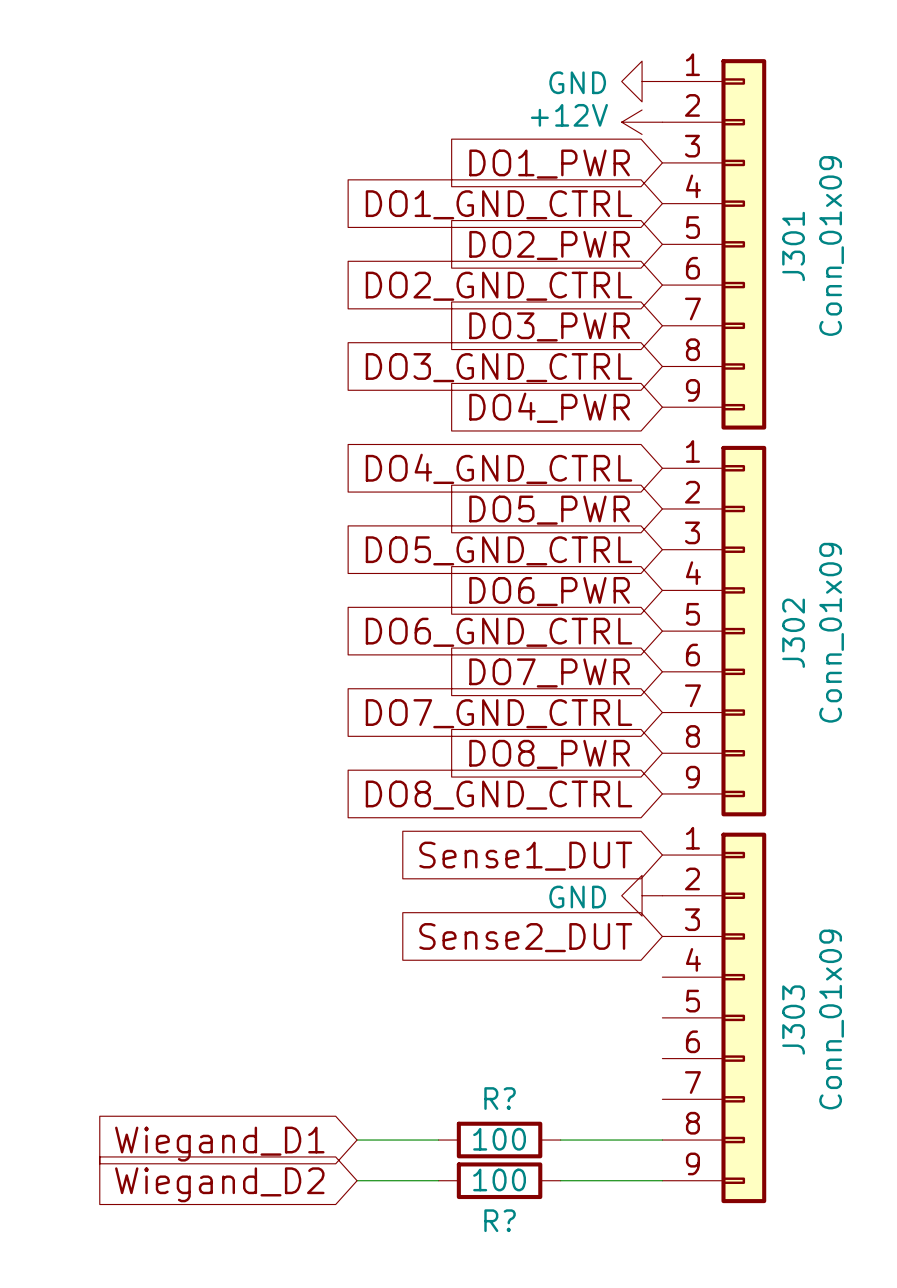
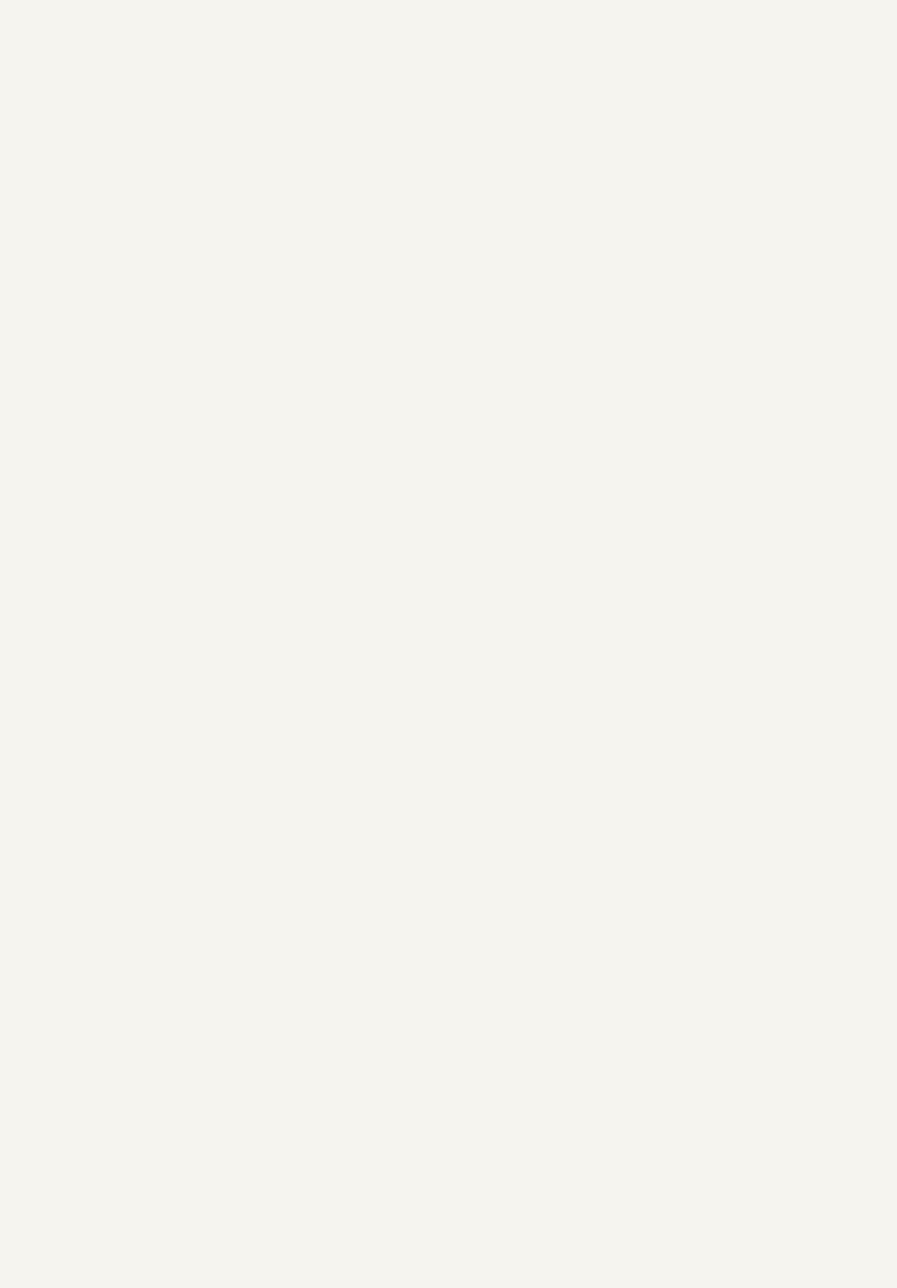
power symbol: GND (642, 81) -> none
power symbol: +12V (642, 122) -> none
global label: DO1_PWR (549, 164) -> none
global label: DO1_GND_CTRL (498, 204) -> none
J301: Conn_01x09 (714, 244) -> none
global label: DO2_PWR (549, 245) -> none
global label: DO2_GND_CTRL (498, 286) -> none
global label: DO3_PWR (549, 326) -> none
global label: DO3_GND_CTRL (498, 367) -> none
global label: DO4_PWR (549, 407) -> none
global label: DO4_GND_CTRL (498, 468) -> none
global label: DO5_PWR (549, 510) -> none
global label: DO5_GND_CTRL (498, 550) -> none
global label: DO6_PWR (549, 591) -> none
J302: Conn_01x09 (714, 631) -> none
global label: DO6_GND_CTRL (498, 632) -> none
global label: DO7_PWR (549, 672) -> none
global label: DO7_GND_CTRL (498, 713) -> none
global label: DO8_PWR (549, 754) -> none
global label: DO8_GND_CTRL (498, 795) -> none
global label: Sense1_DUT (525, 856) -> none
power symbol: GND (642, 895) -> none
global label: Sense2_DUT (525, 937) -> none
J303: Conn_01x09 (714, 1017) -> none
wire: (357, 1140) (438, 1140) -> none
R?: 100 (499, 1140) -> none
wire: (560, 1140) (662, 1140) -> none
global label: Wiegand_D1 (219, 1144) -> none
wire: (357, 1180) (438, 1180) -> none
R?: 100 (499, 1180) -> none
wire: (560, 1180) (662, 1180) -> none
global label: Wiegand_D2 (219, 1184) -> none

